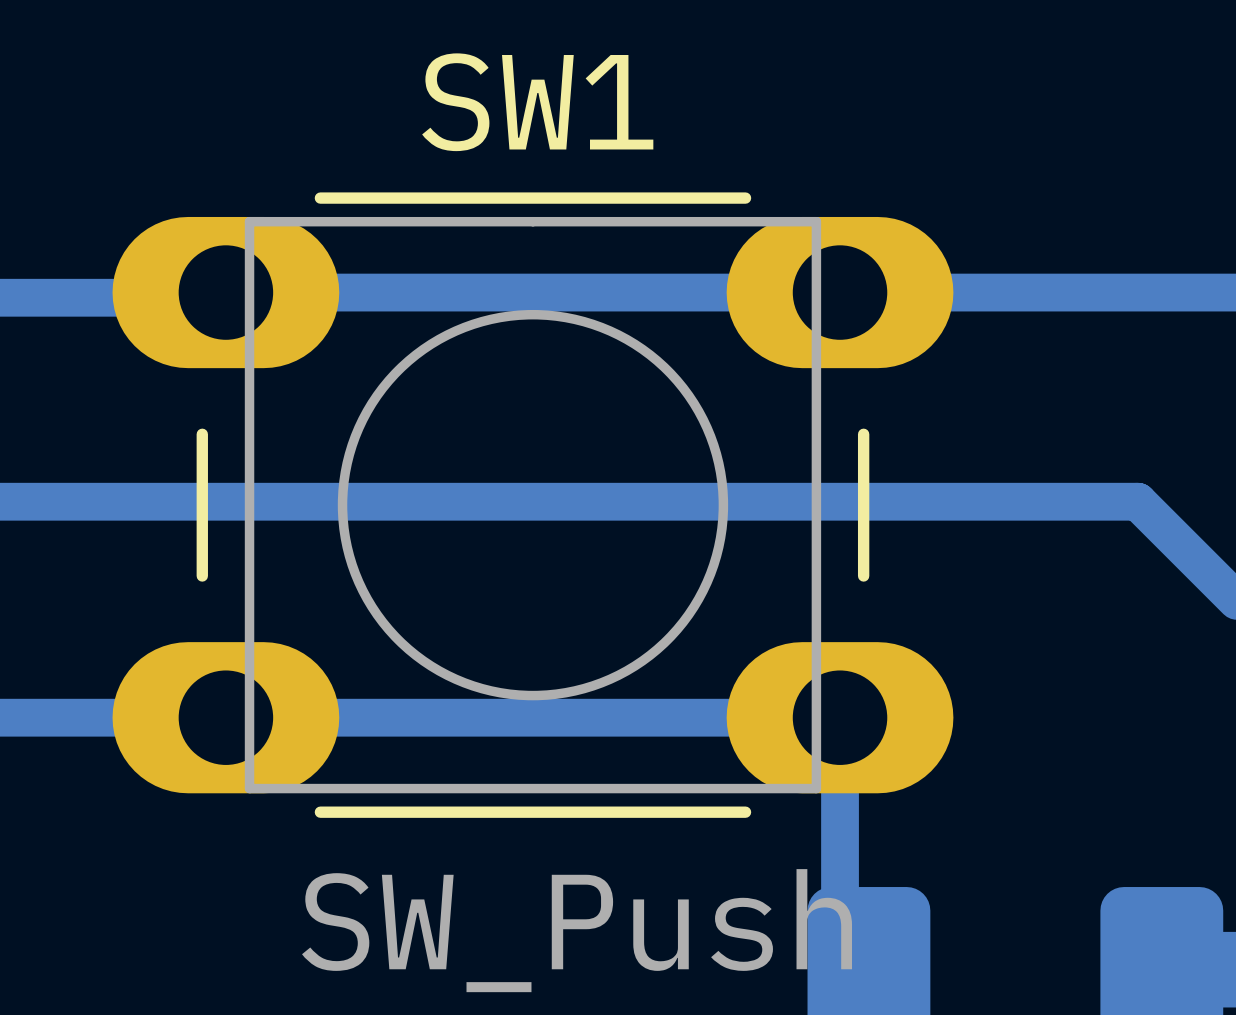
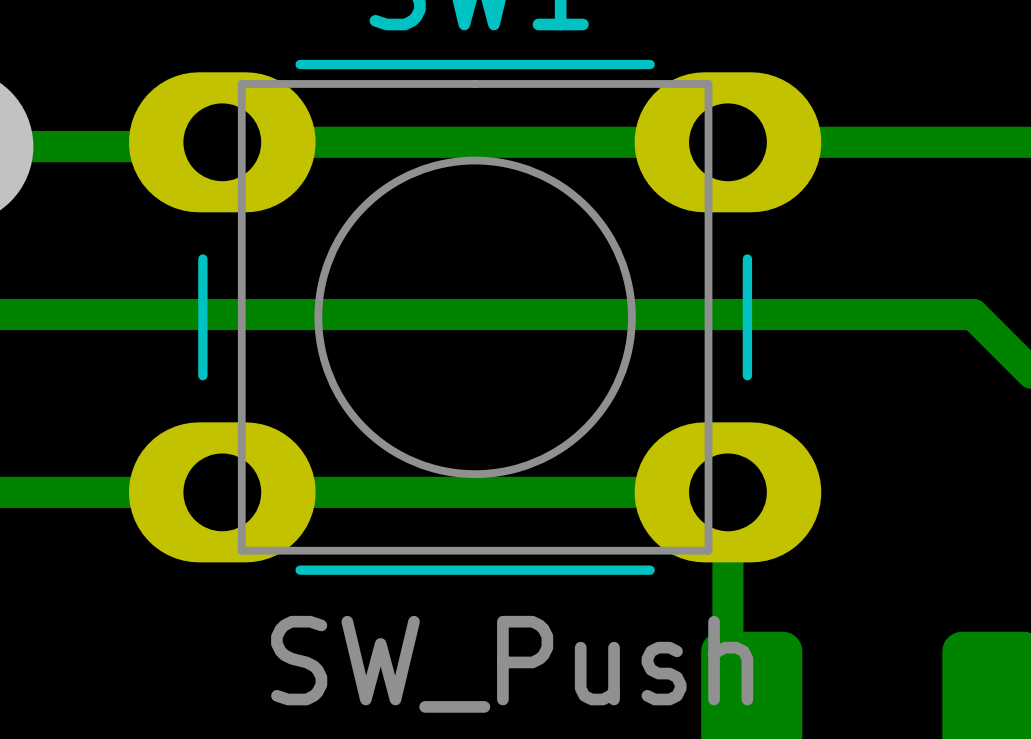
SW1 footprint: [112, 192, 954, 818] -> [128, 59, 822, 575]

